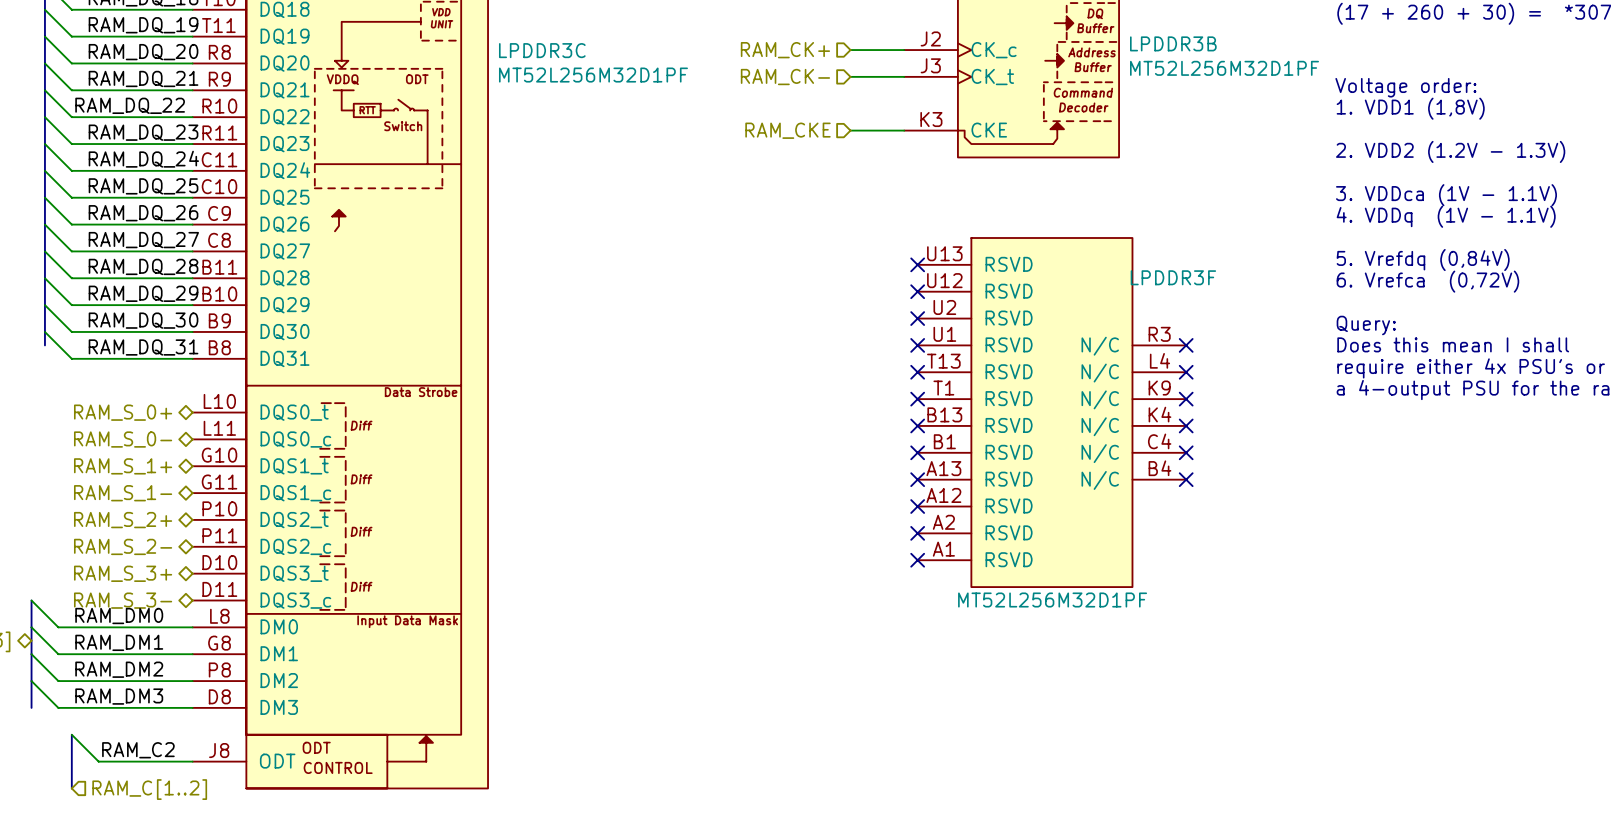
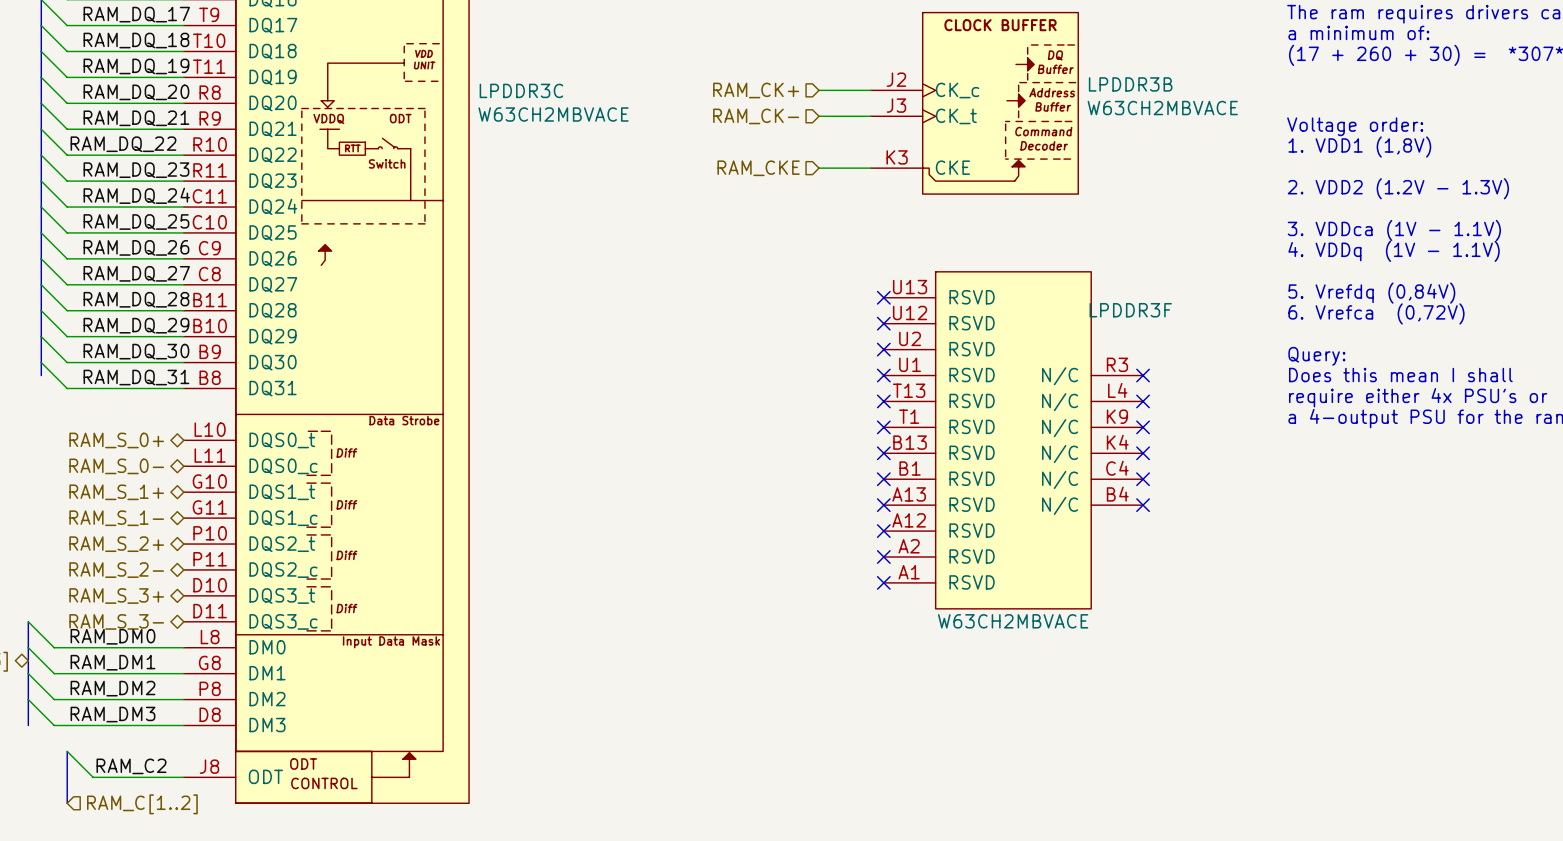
LPDDR3B value: MT52L256M32D1PF (1224, 68) -> W63CH2MBVACE (1162, 108)
LPDDR3C value: MT52L256M32D1PF (593, 75) -> W63CH2MBVACE (553, 114)
LPDDR3F value: MT52L256M32D1PF (1052, 600) -> W63CH2MBVACE (1013, 621)

